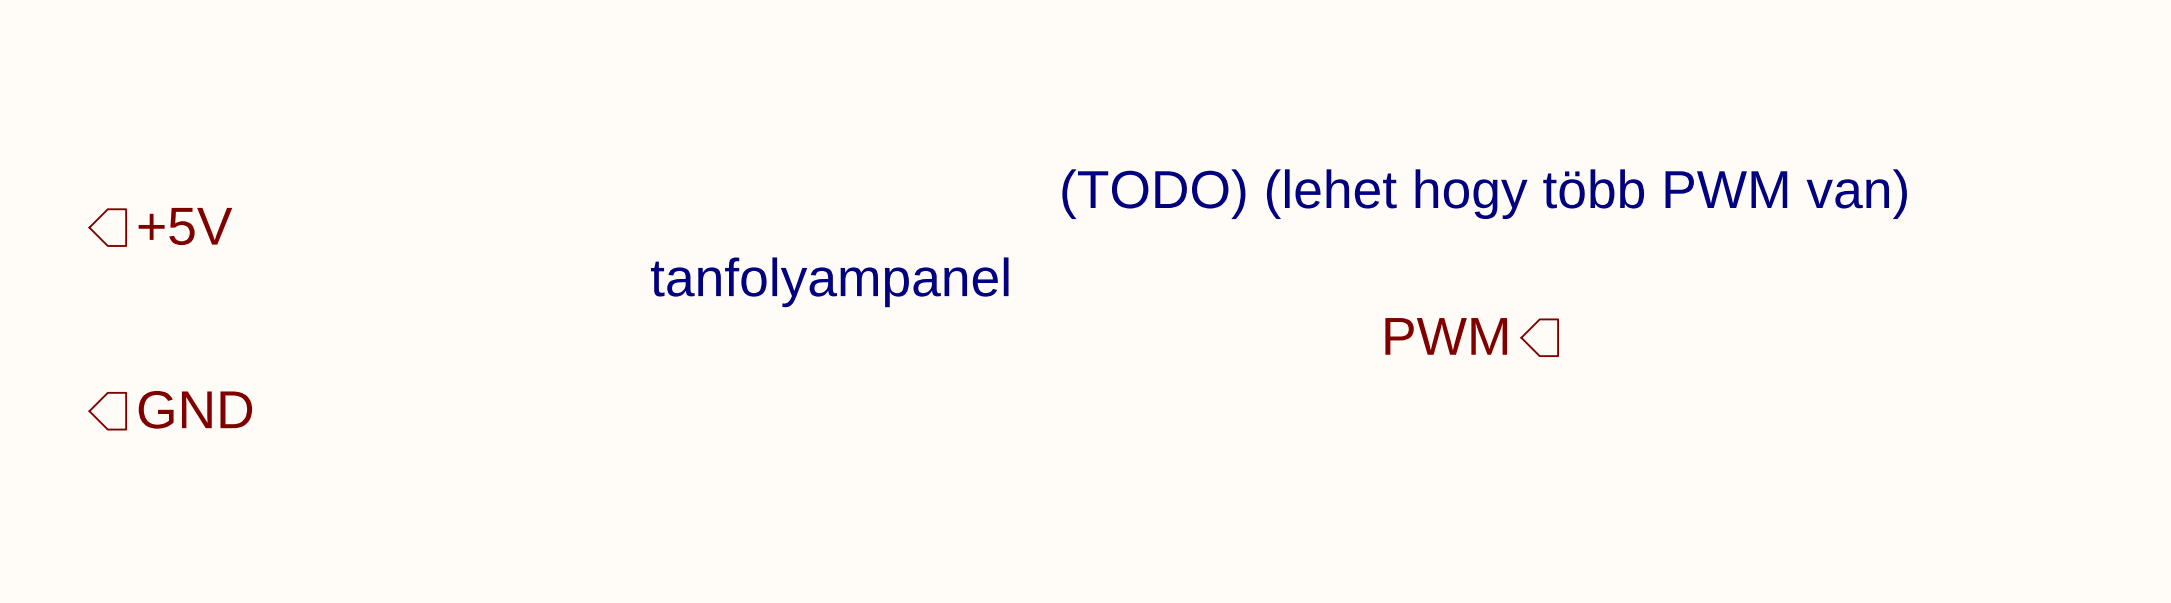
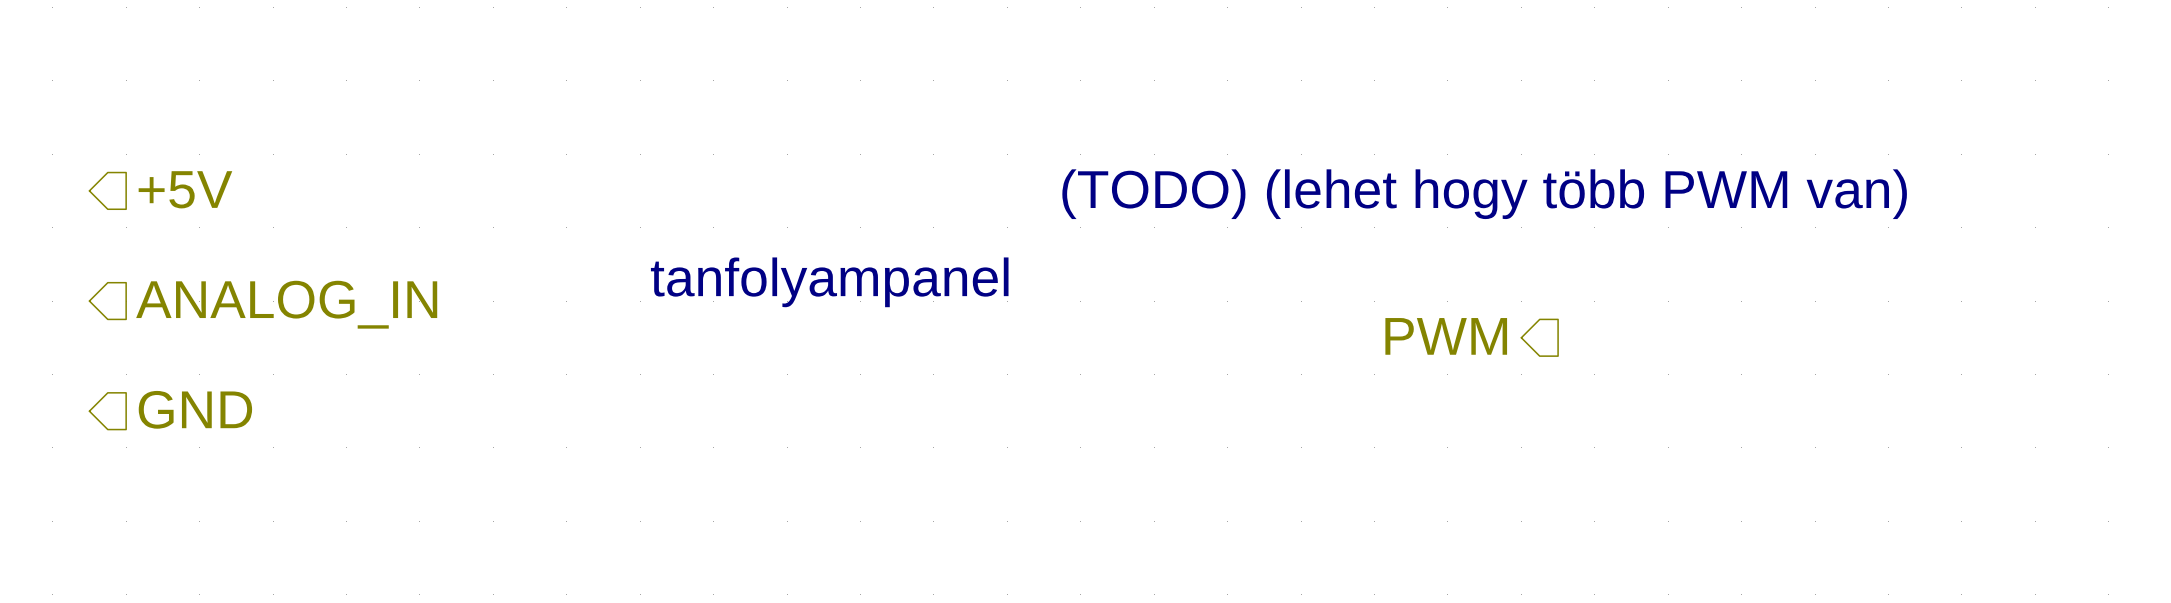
hierarchical label position: +5V (185, 226) -> +5V (185, 189)
hierarchical label: none -> ANALOG_IN (286, 304)

